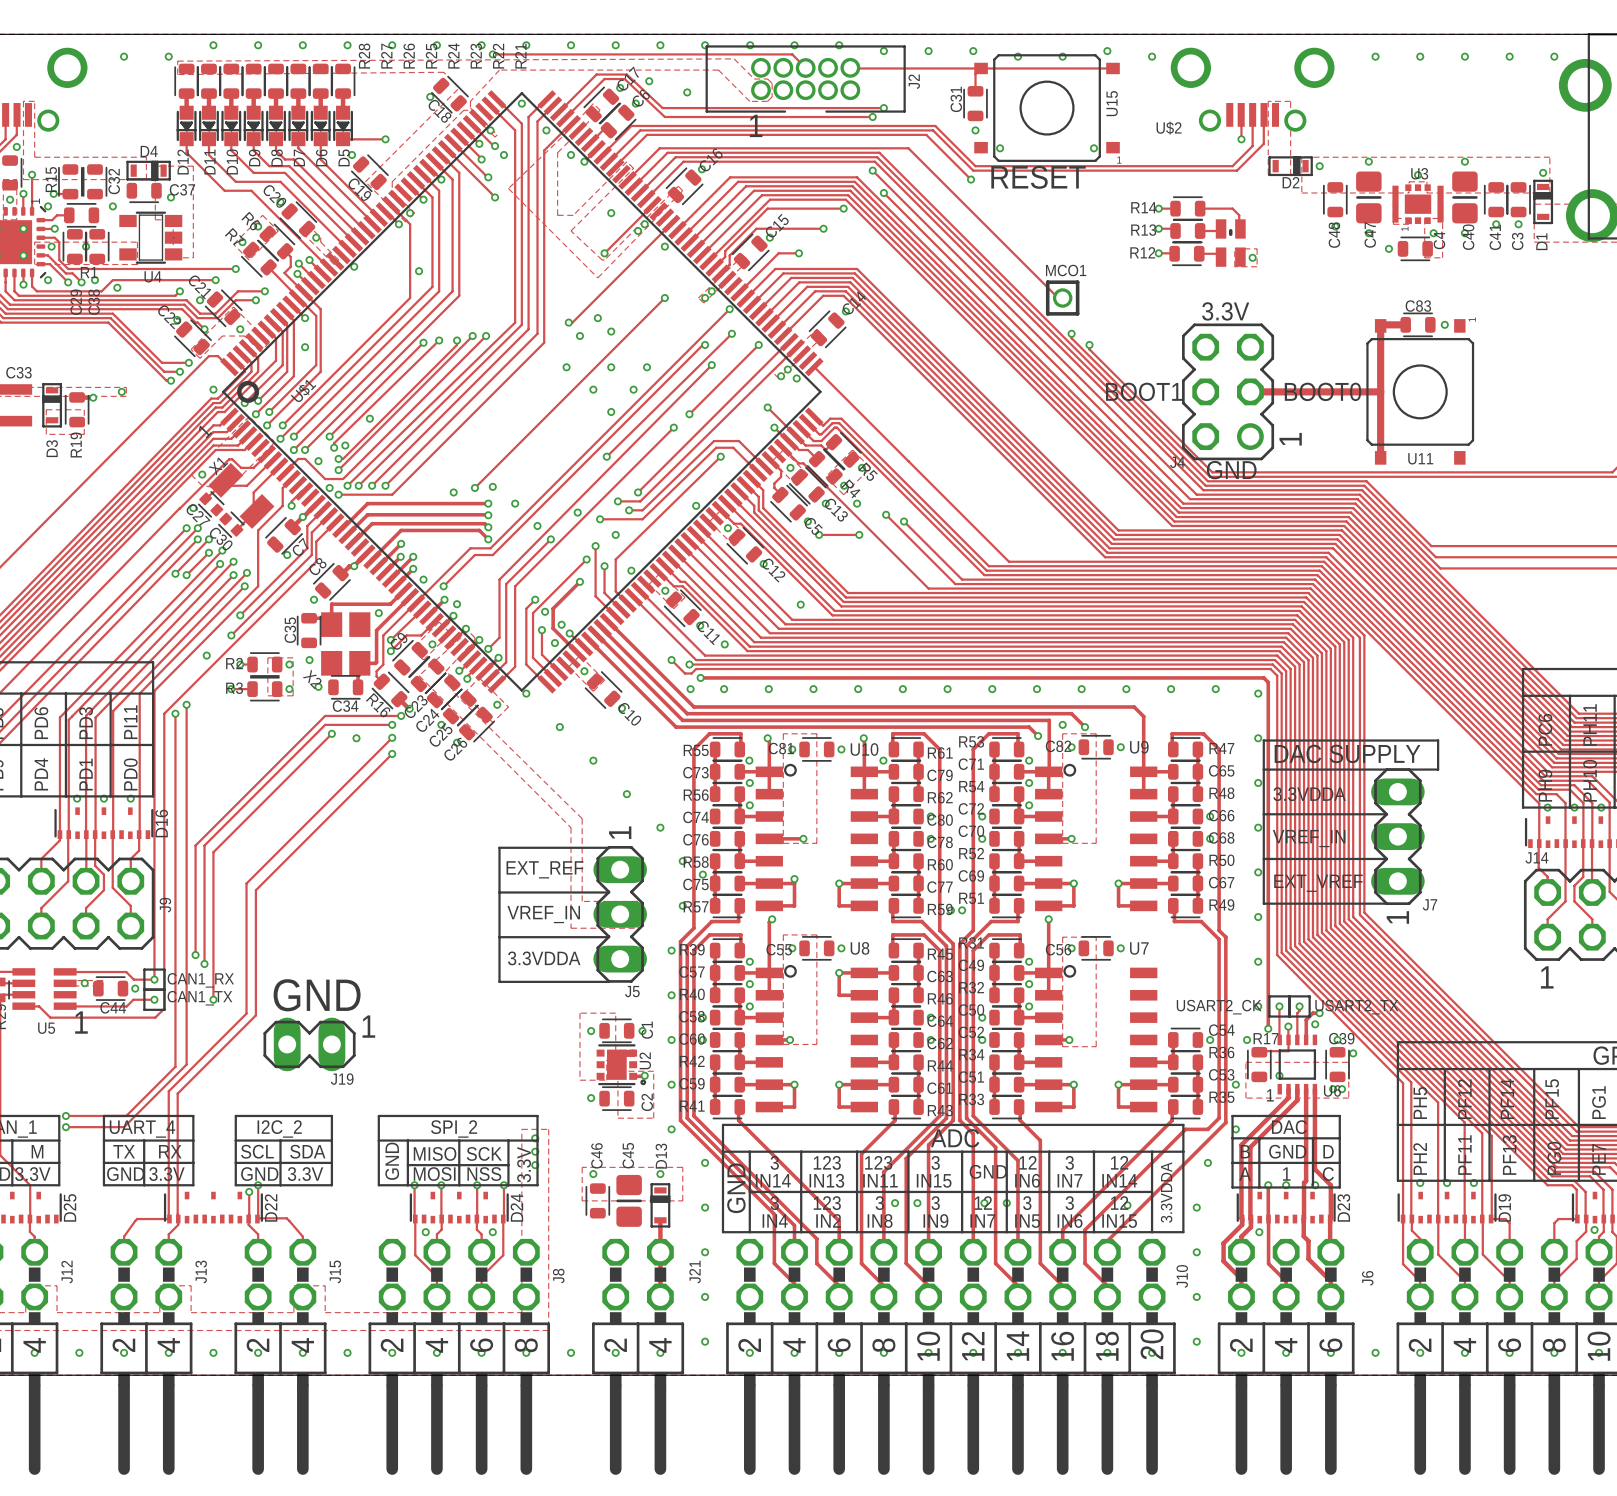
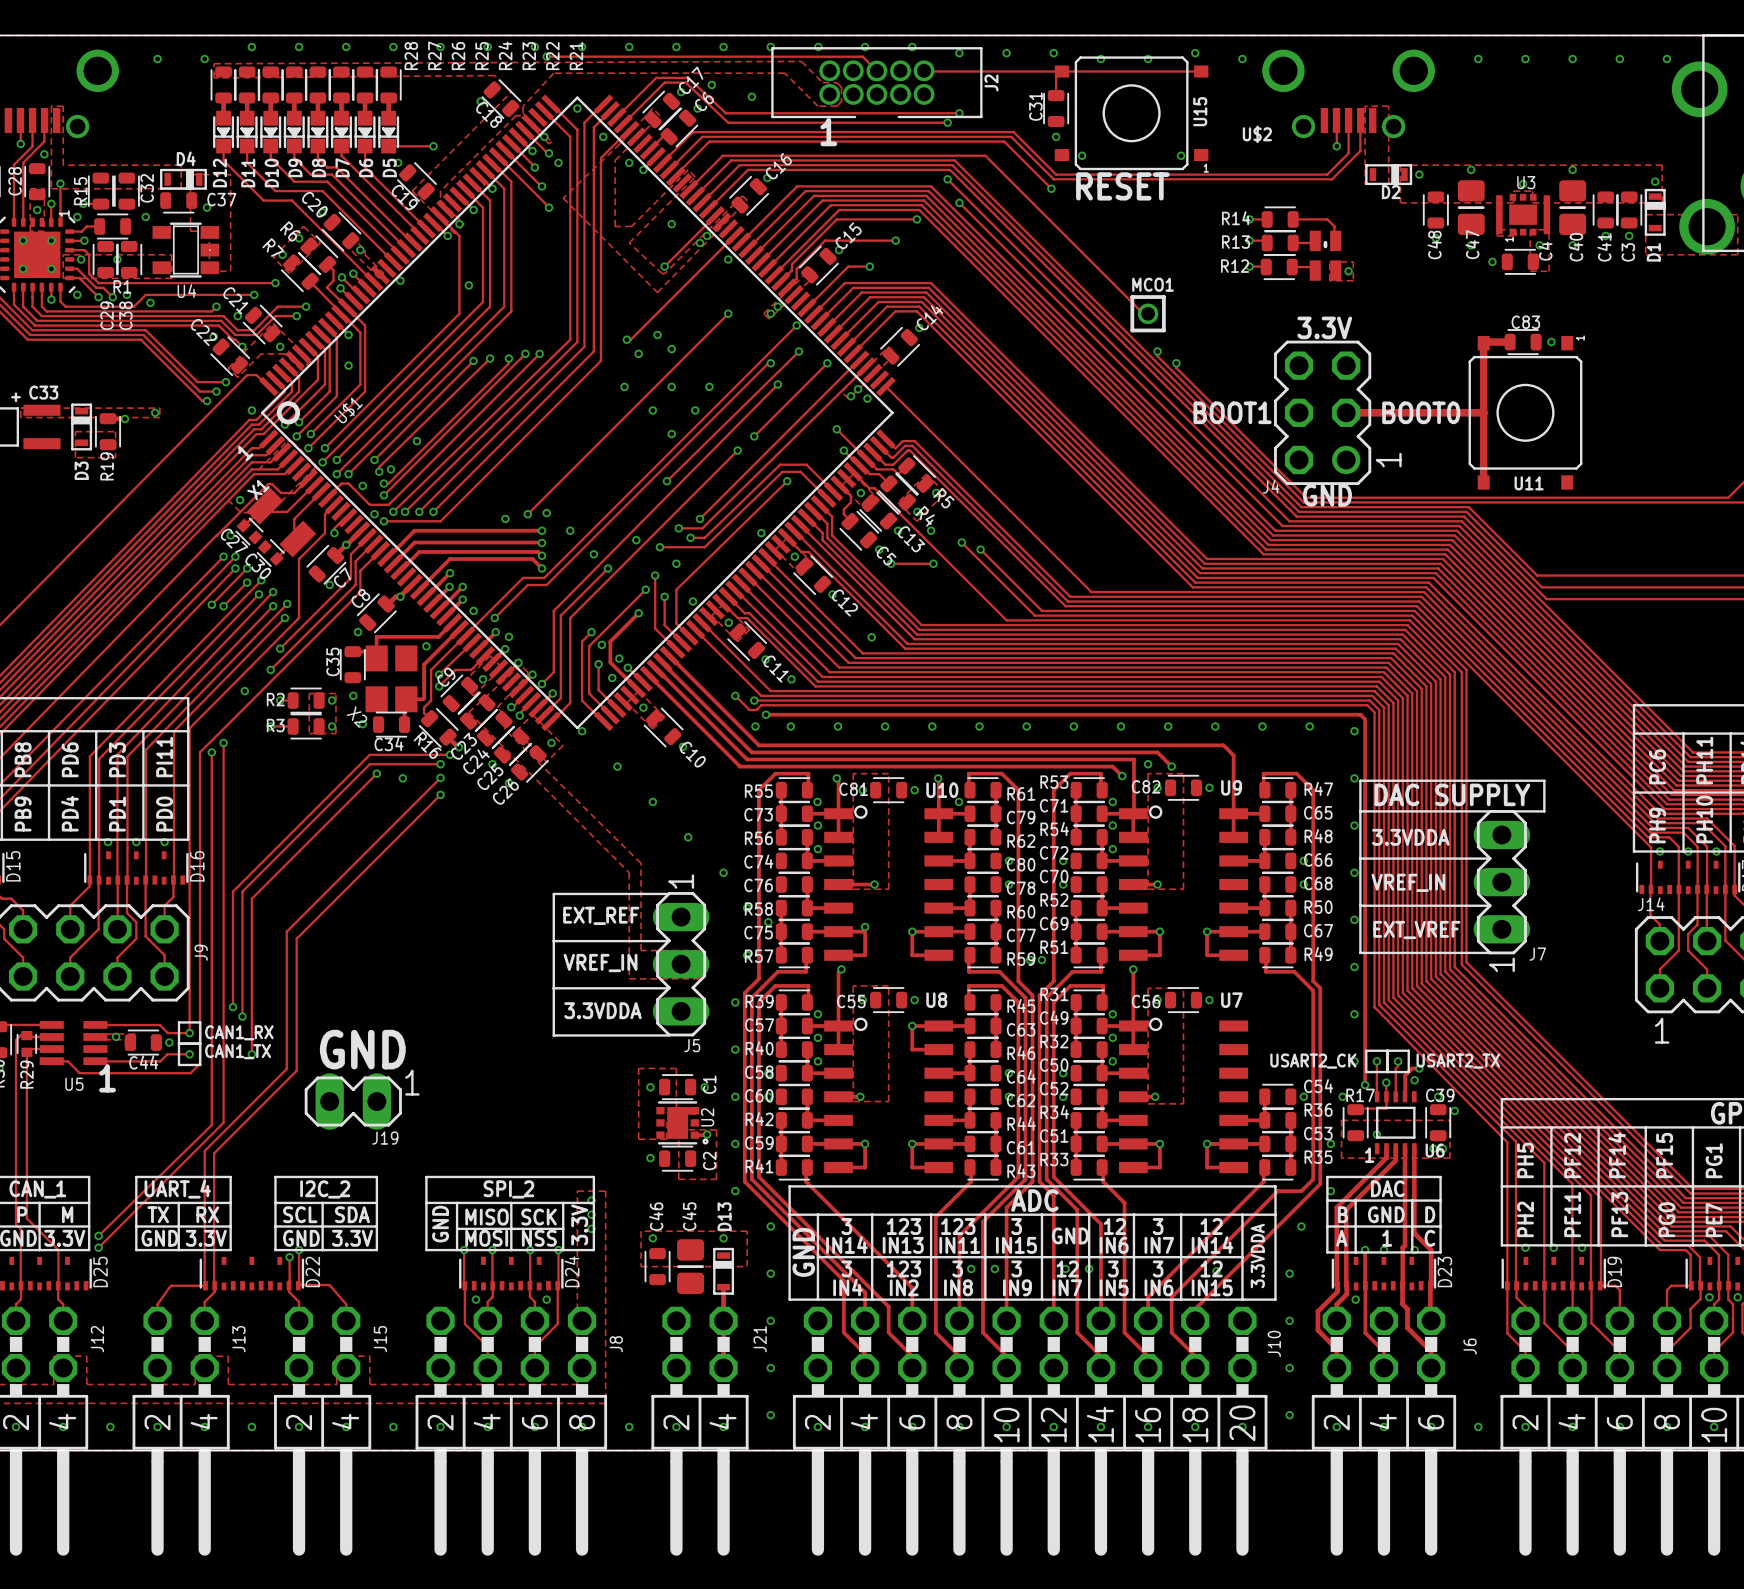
track: (175, 1066) (126, 1115) (65, 1115) -> (211, 1125) (98, 1235)
via: (65, 1115) -> none
track: (65, 1127) (124, 1127) -> (98, 1247) (157, 1188)
via: (65, 1127) -> none
via: none -> (98, 1235)
via: none -> (98, 1247)

